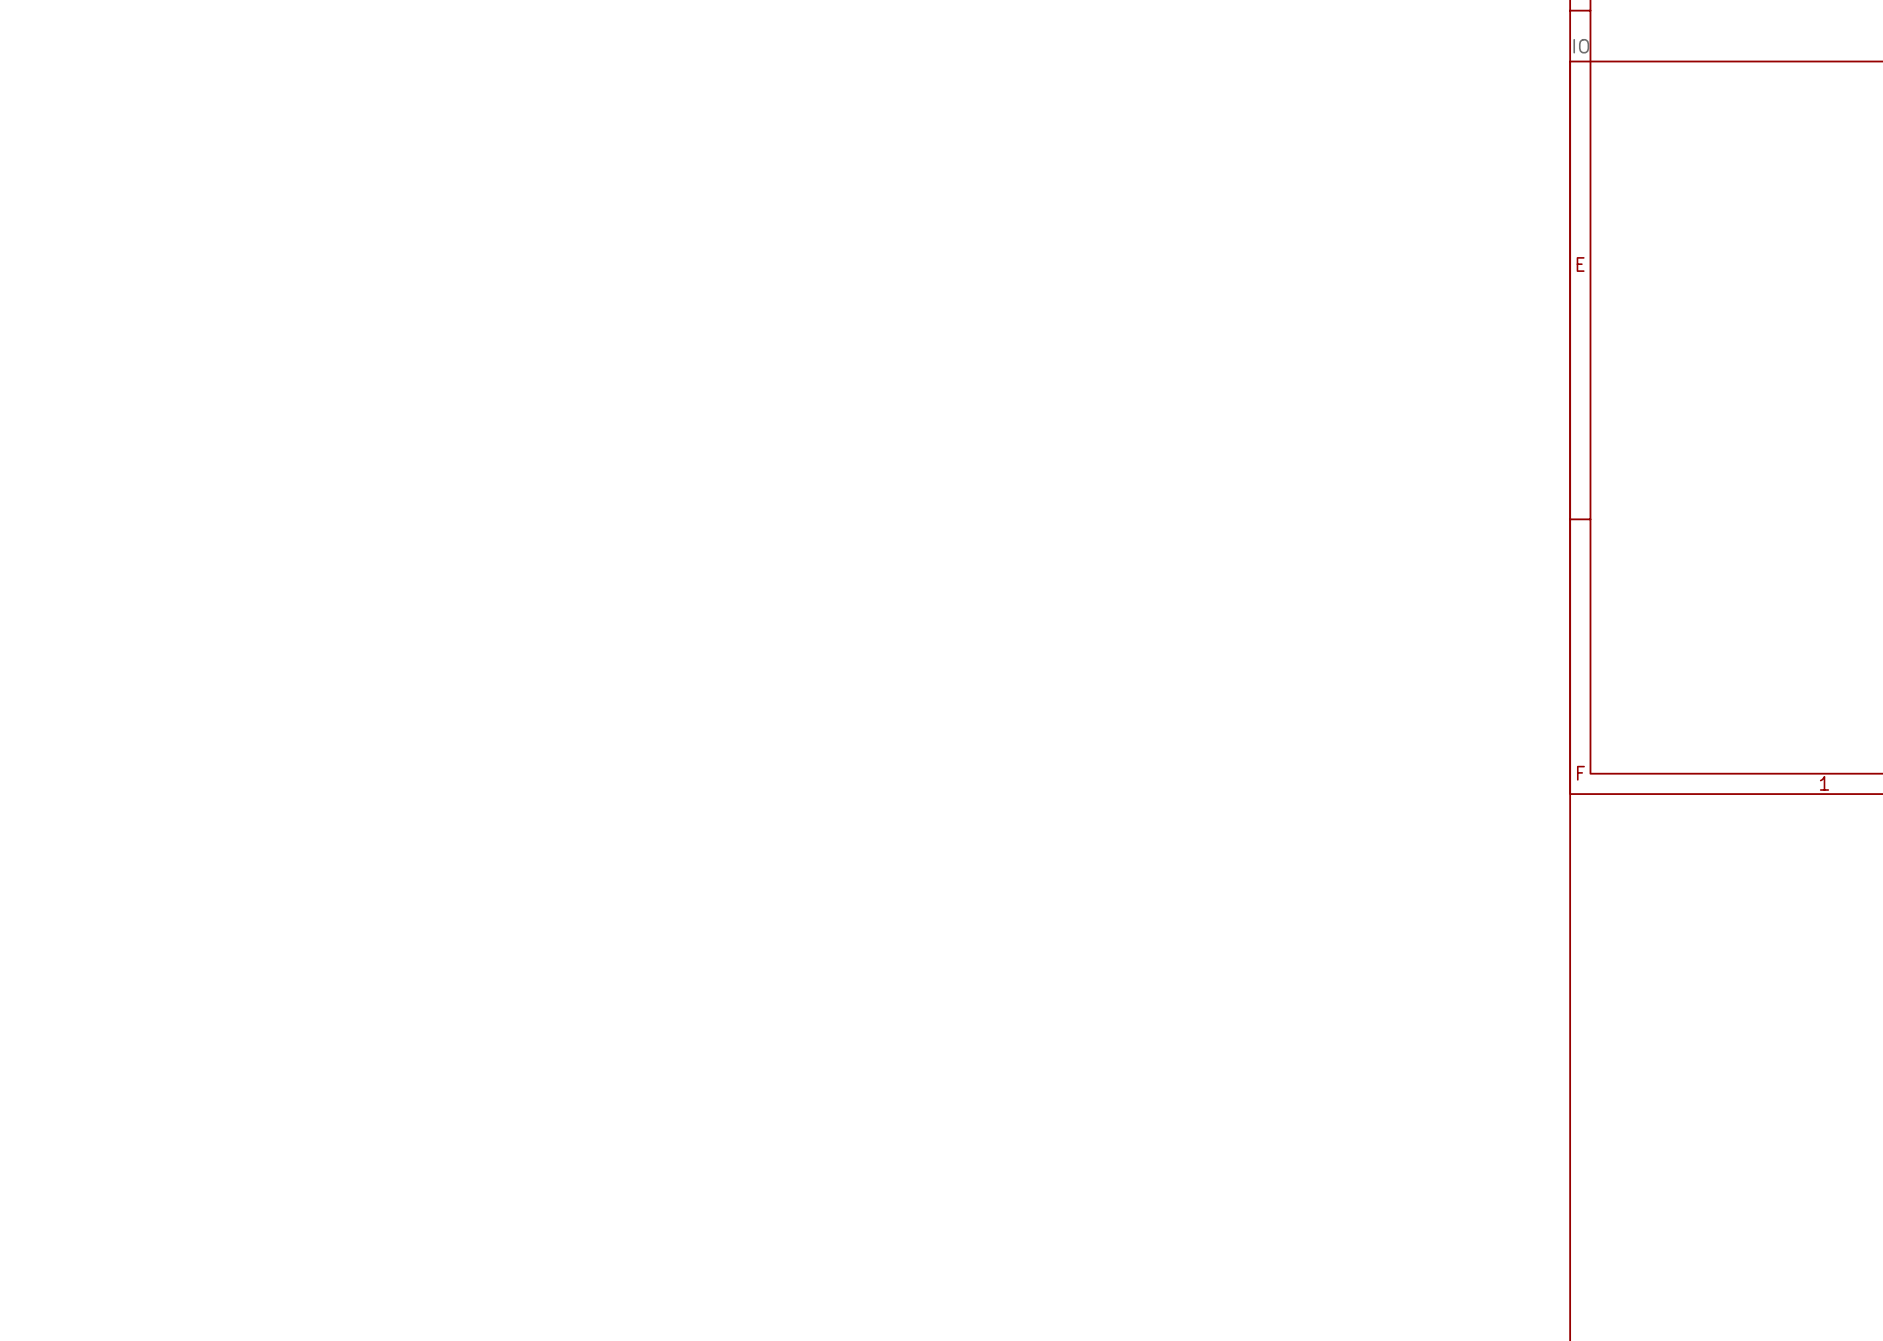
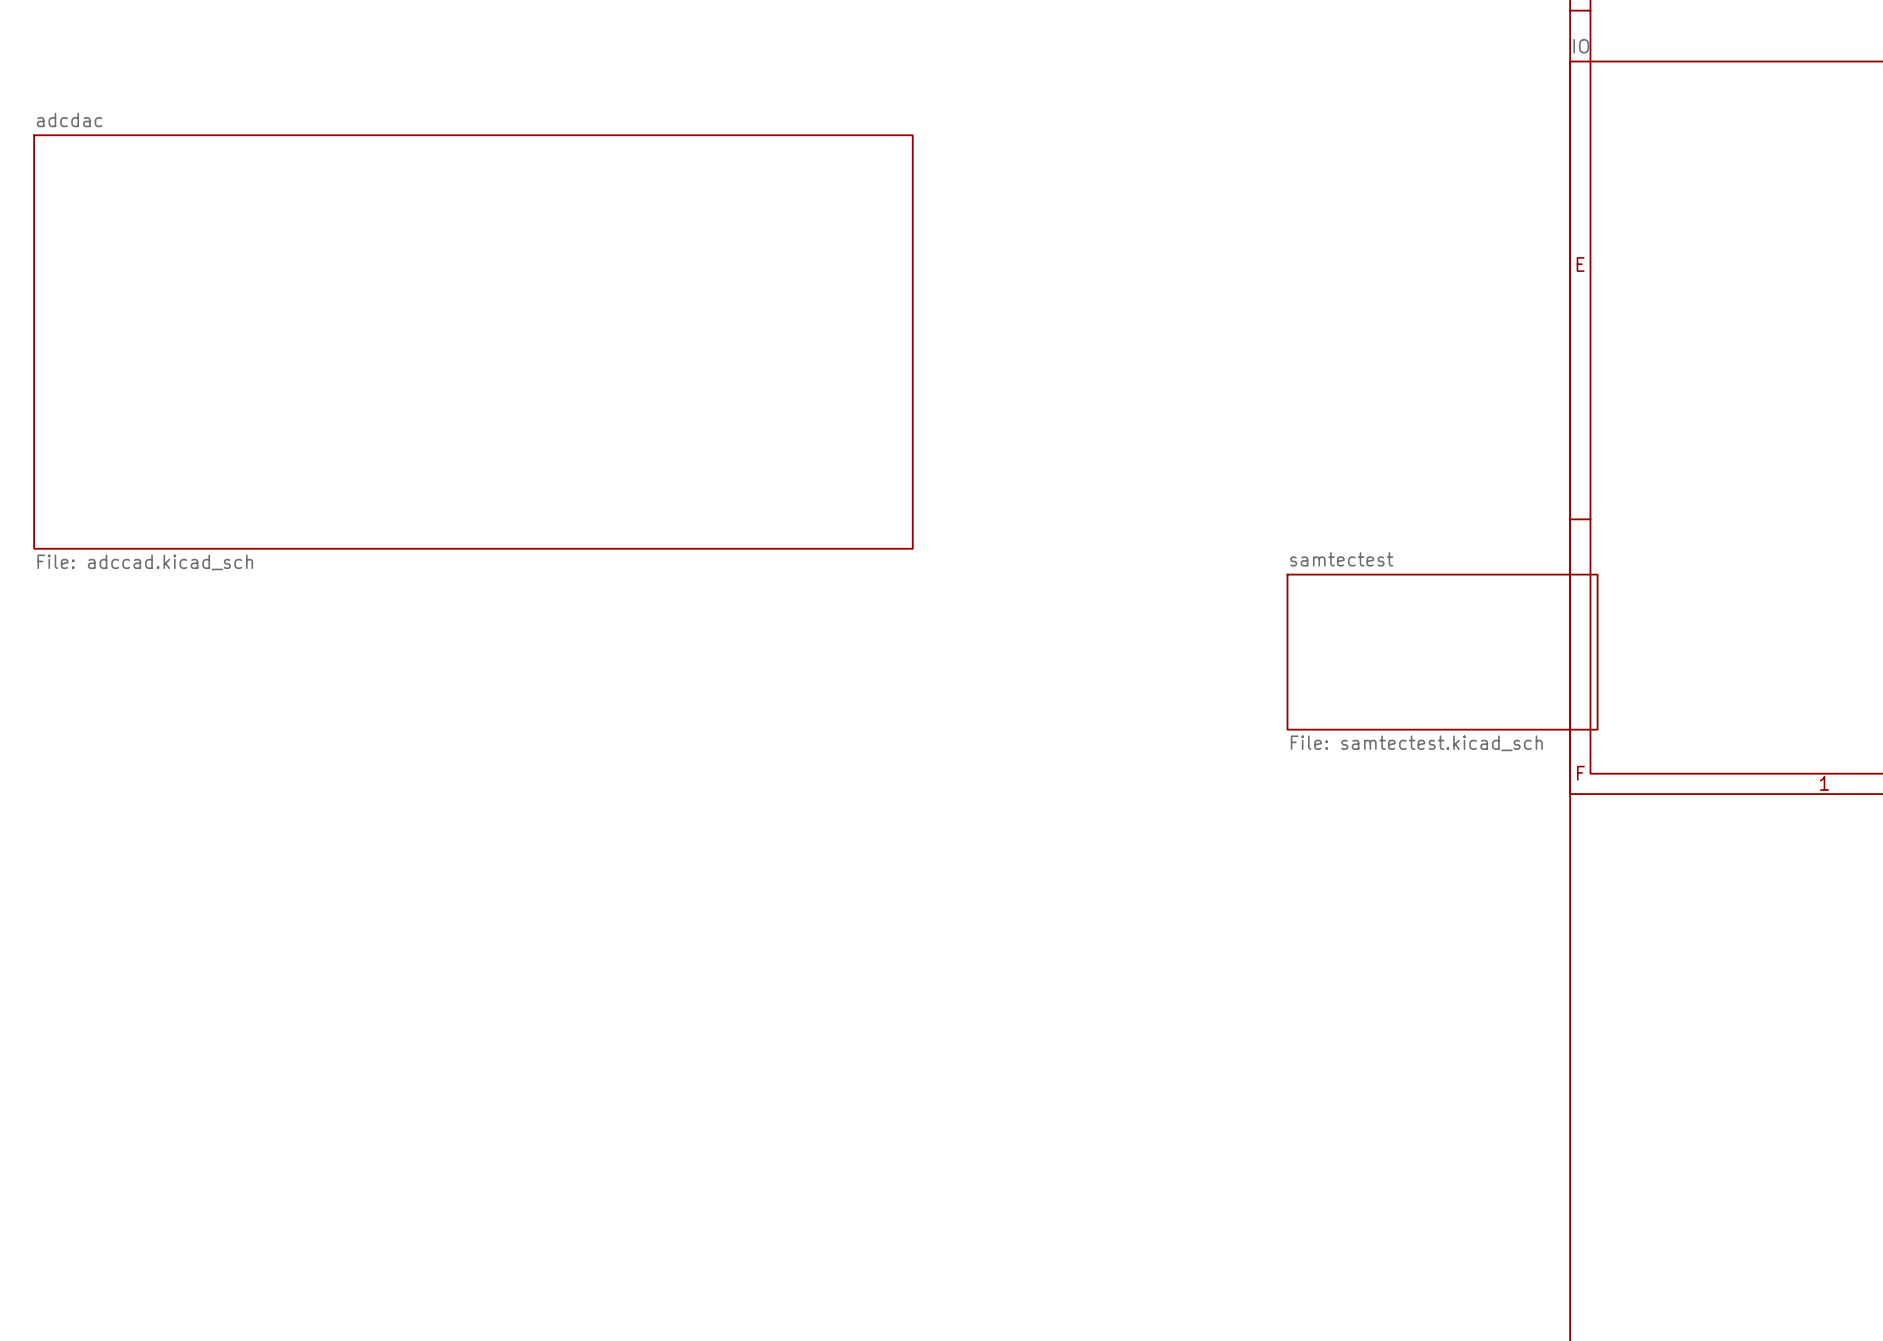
sheet adcdac: none -> File: adccad.kicad_sch (473, 342)
sheet samtectest: none -> File: samtectest.kicad_sch (1442, 652)

